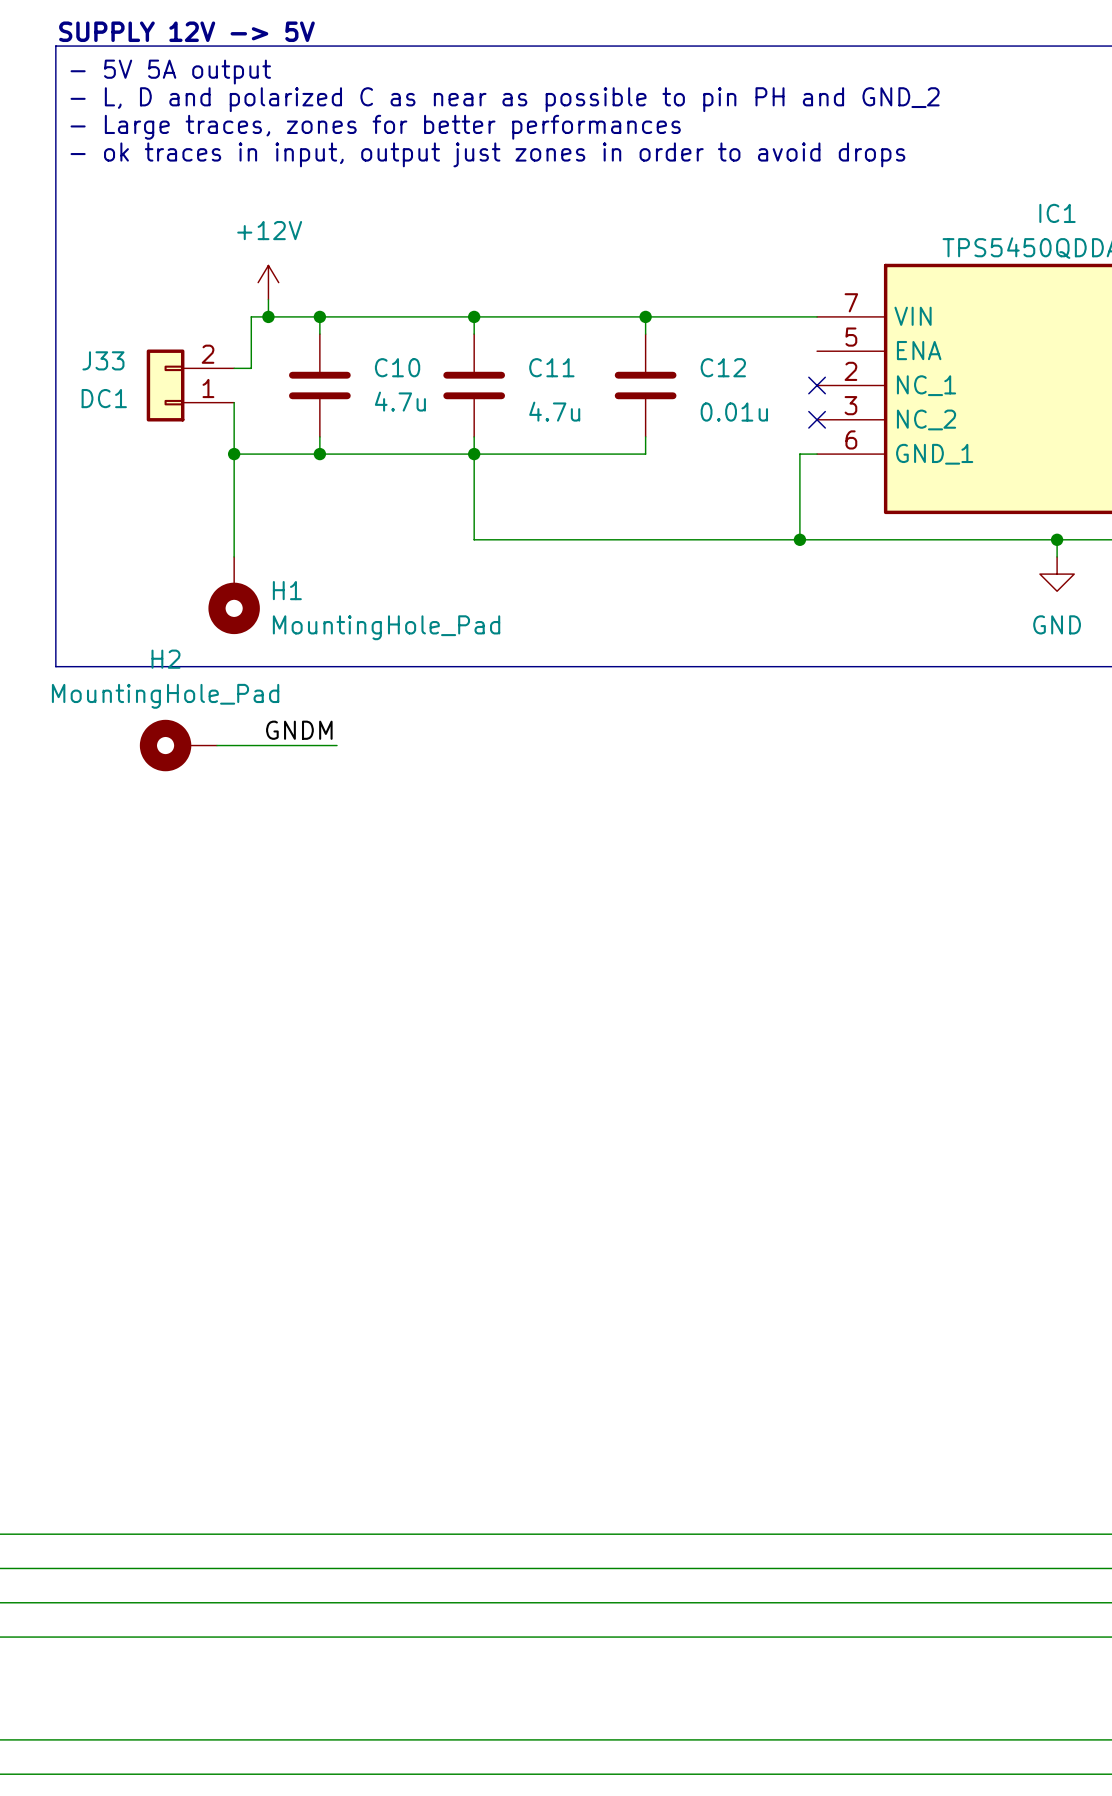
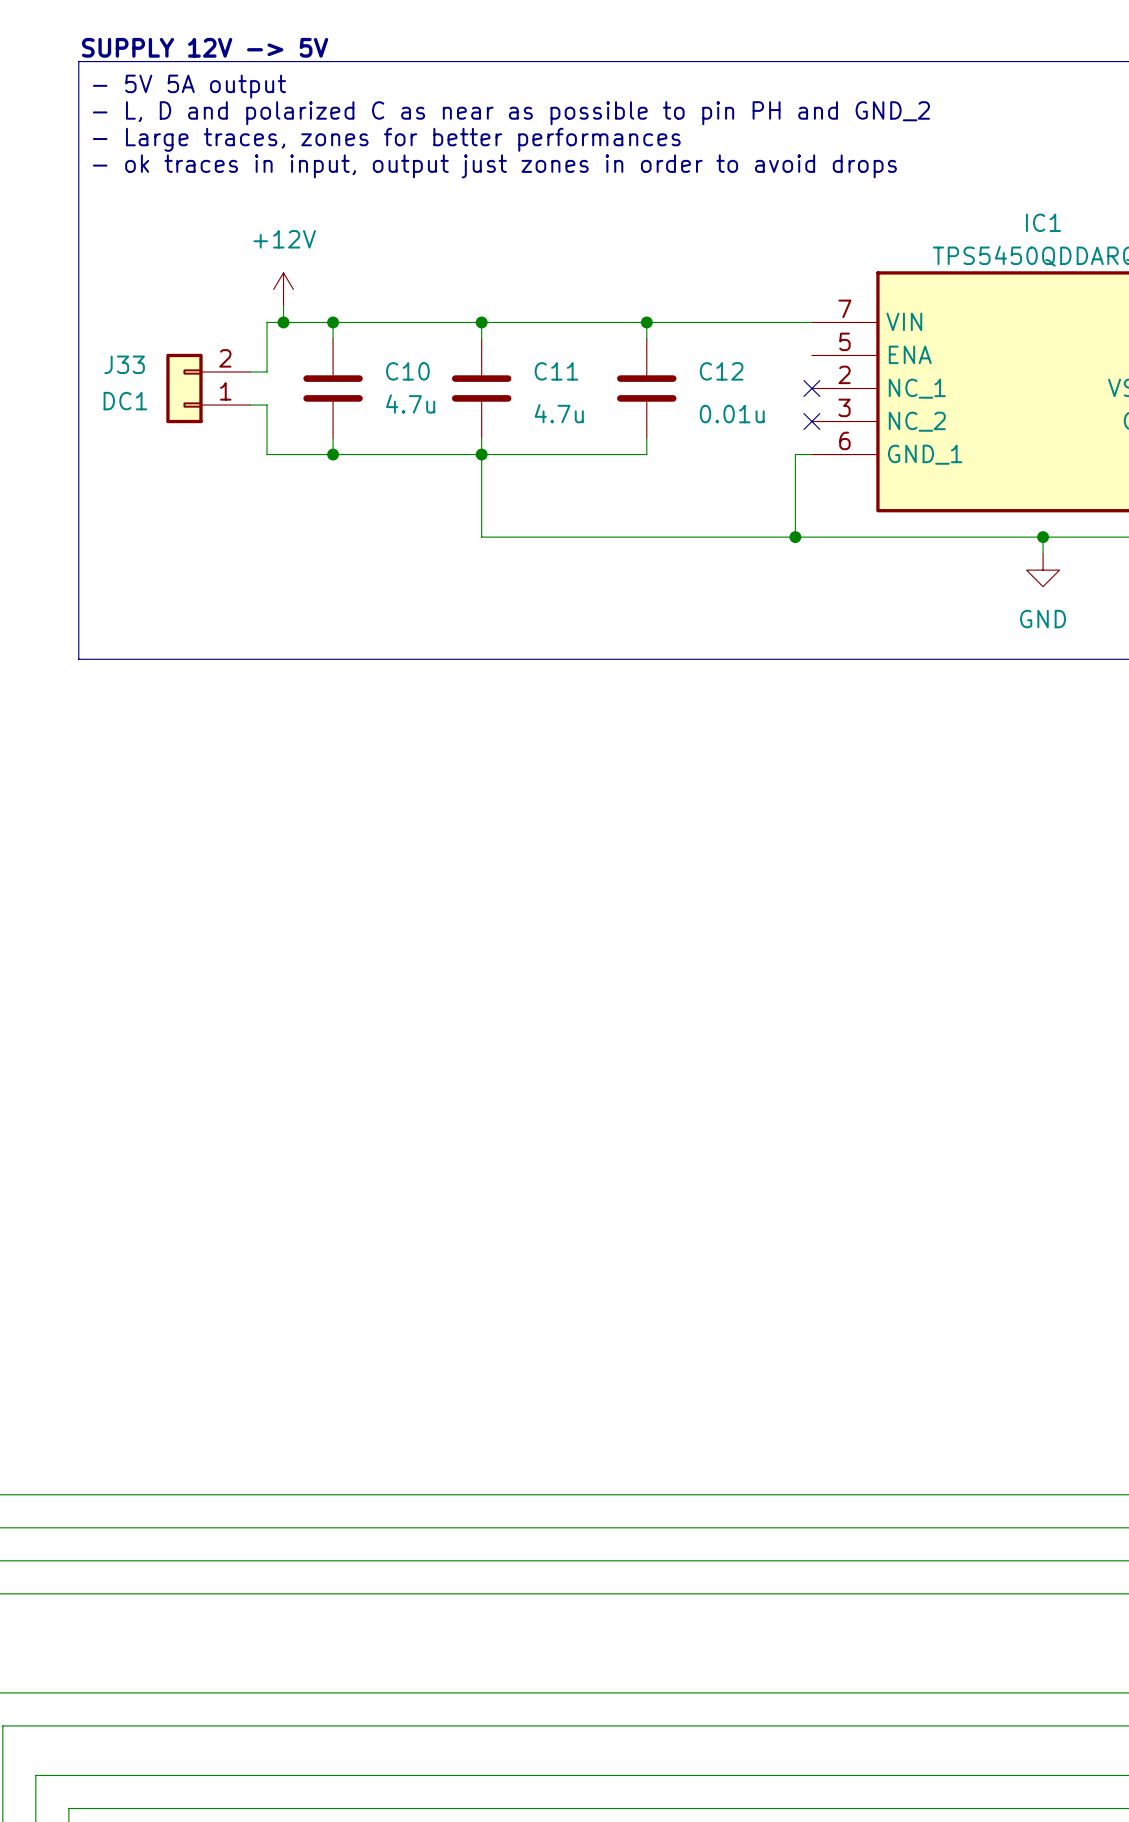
wire: (234, 402) (234, 556) -> none
wire: (234, 454) (251, 454) -> (250, 405) (267, 405) (267, 454)
junction: (234, 454) -> none
H1: MountingHole_Pad (234, 595) -> none
label: GNDM (299, 730) -> none
H2: MountingHole_Pad (178, 745) -> none
wire: (217, 745) (337, 745) -> none

